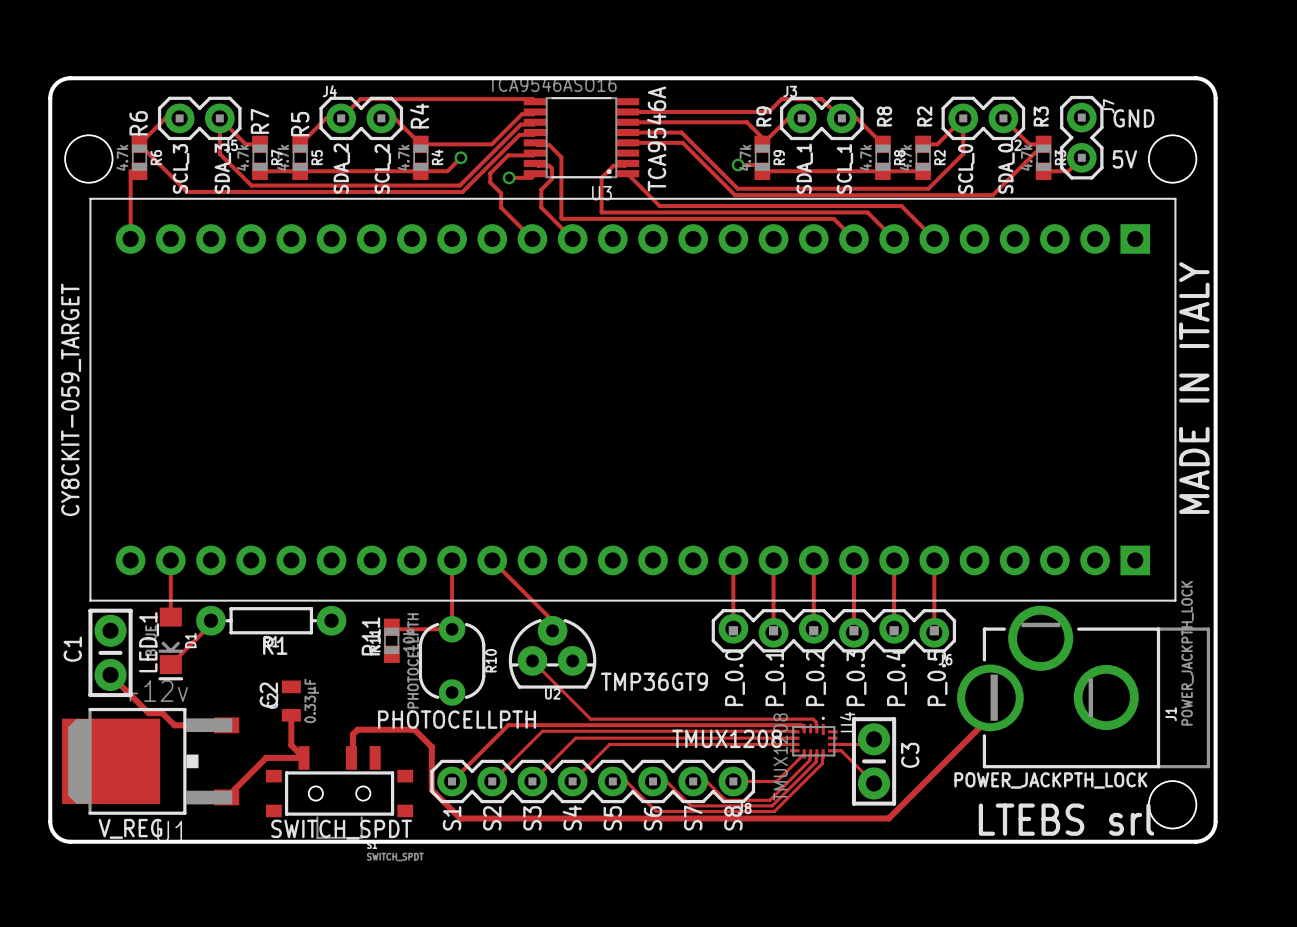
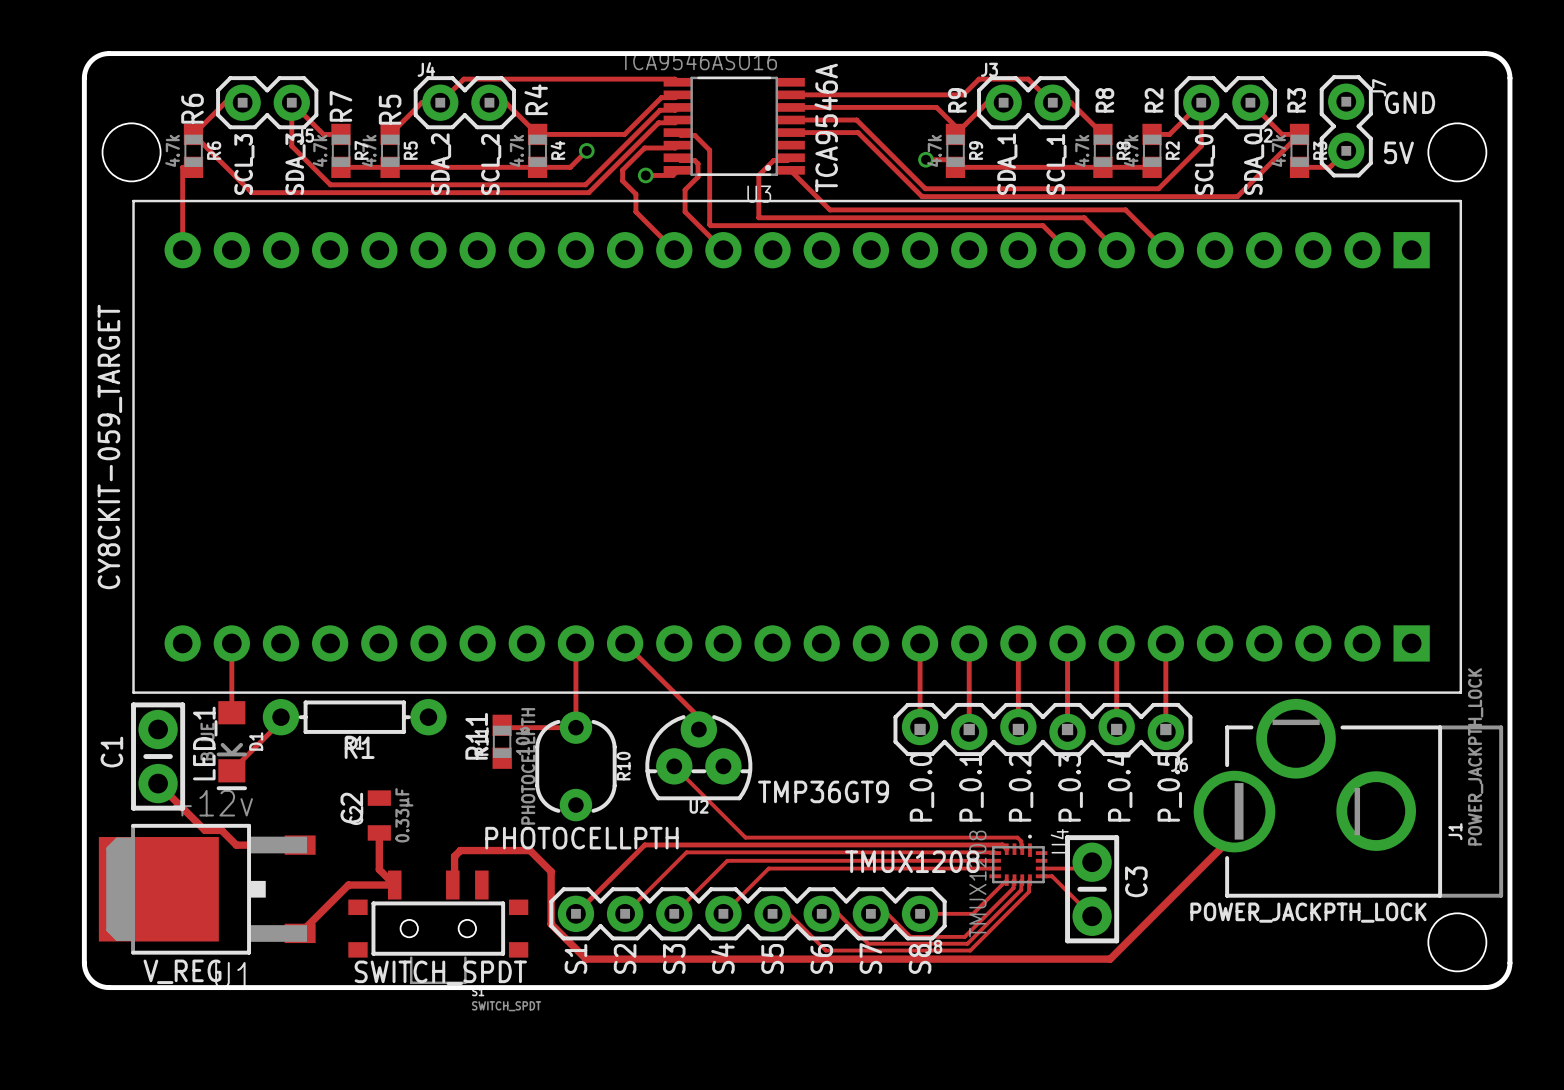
text: MADE IN ITALY (1194, 388) -> none
text: LTEBS srl (1066, 819) -> none

